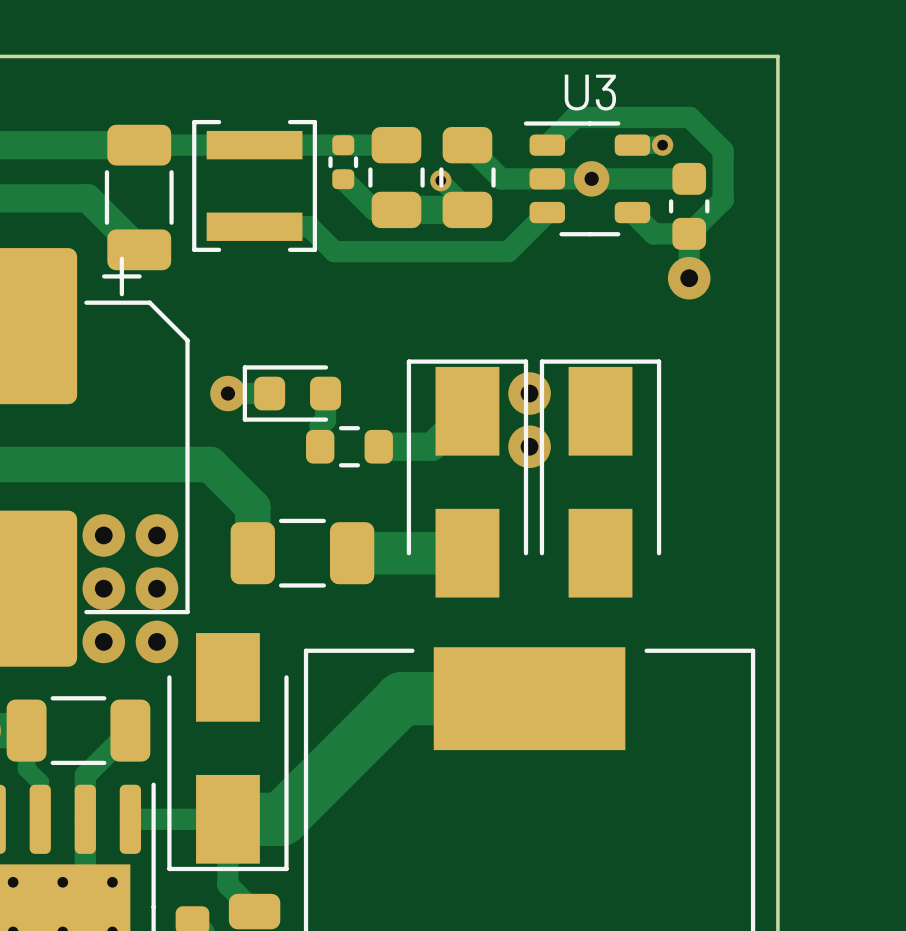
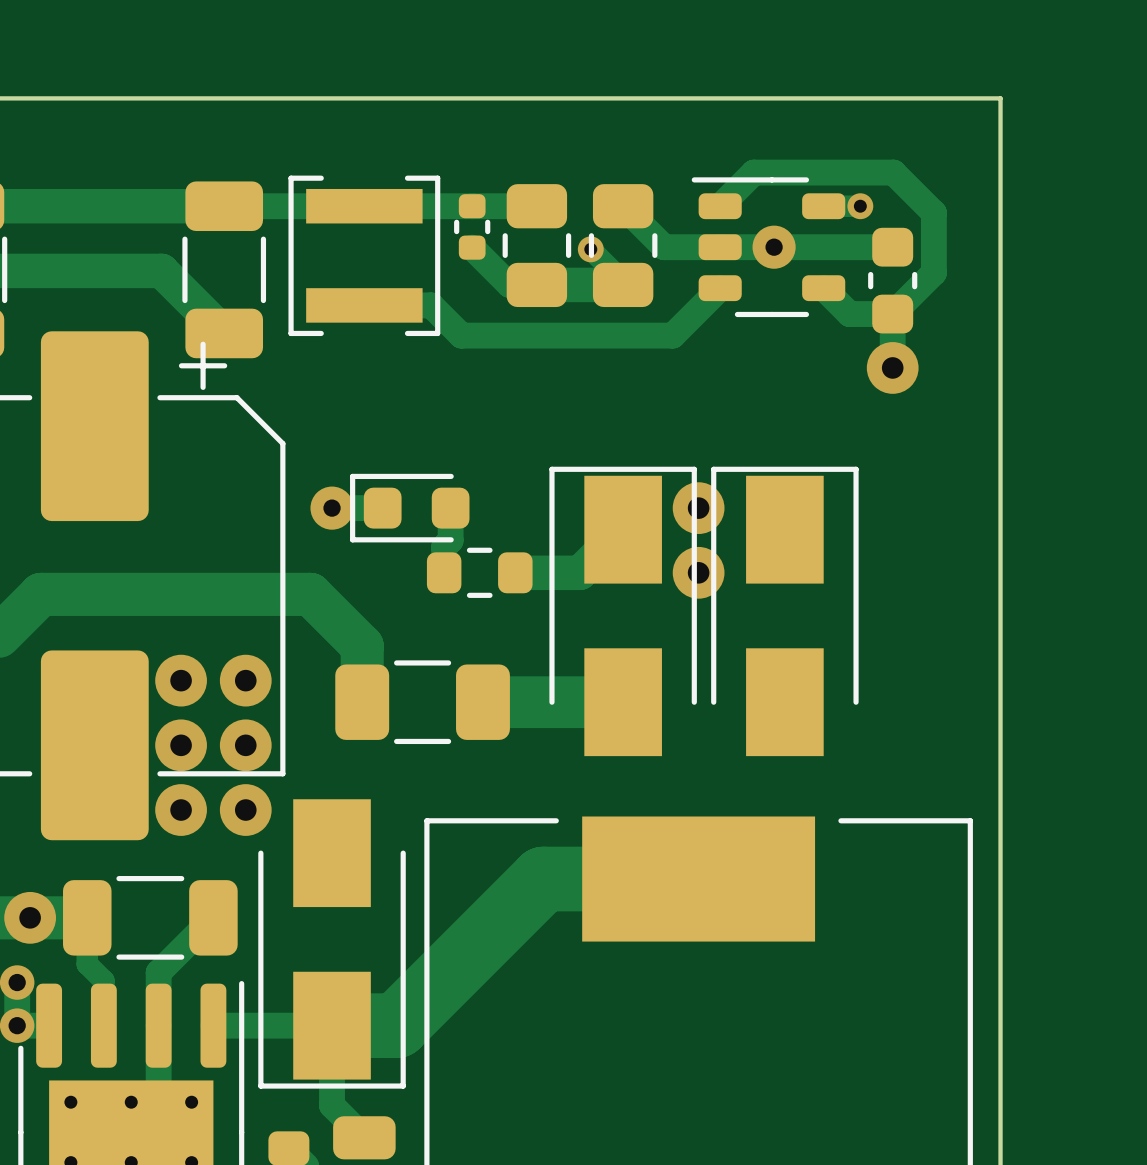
U3 name: U3 (590, 92) -> none

